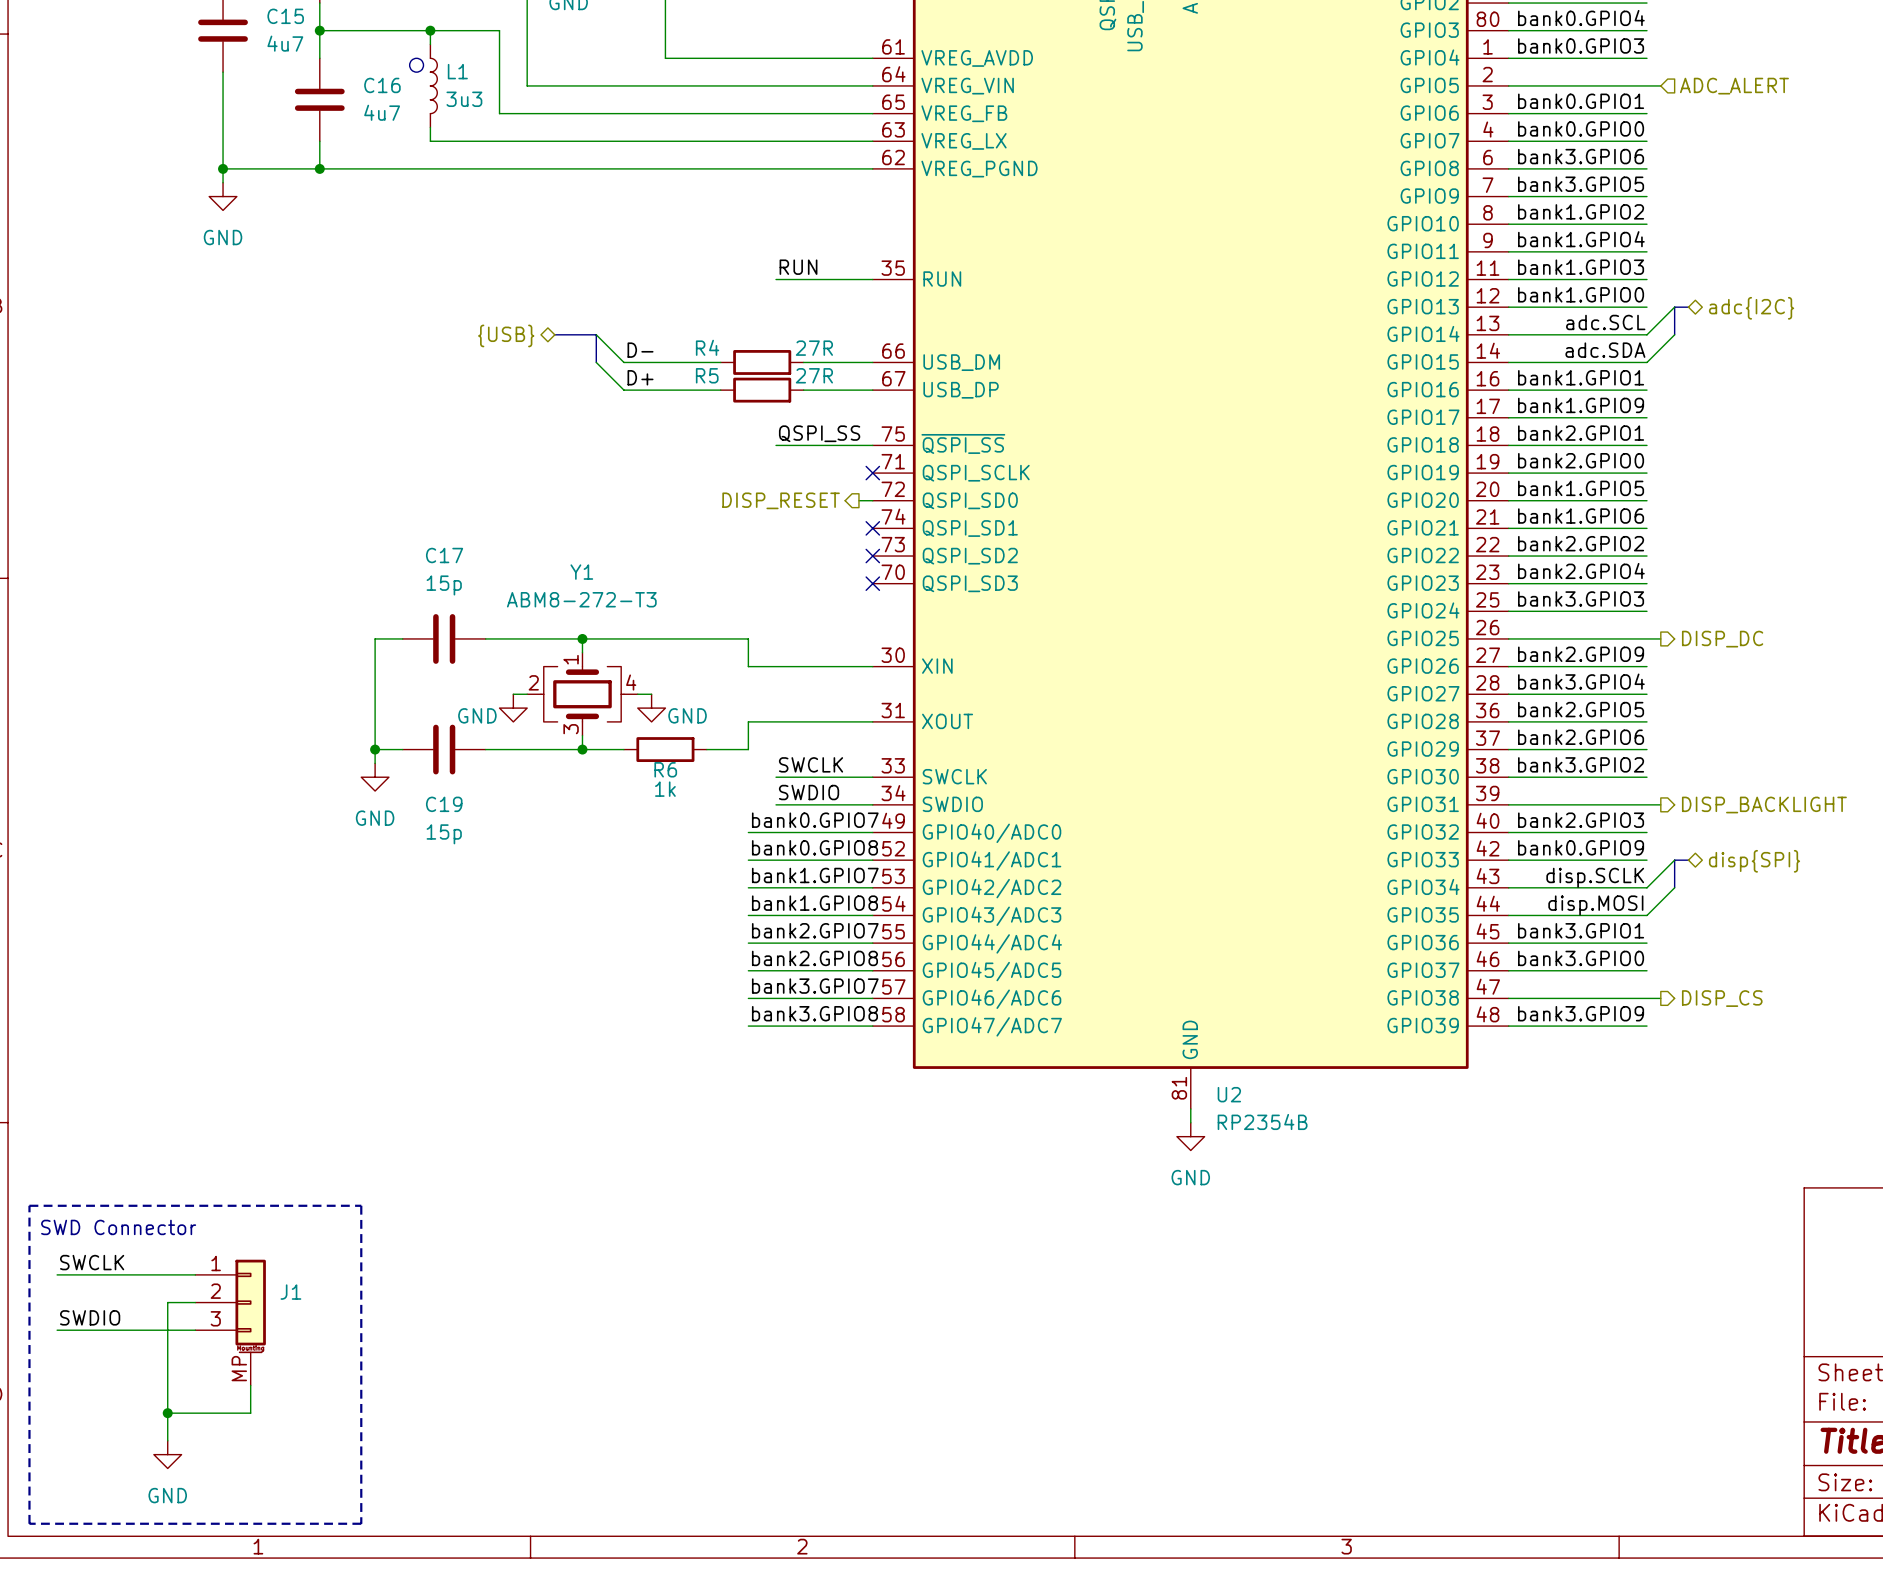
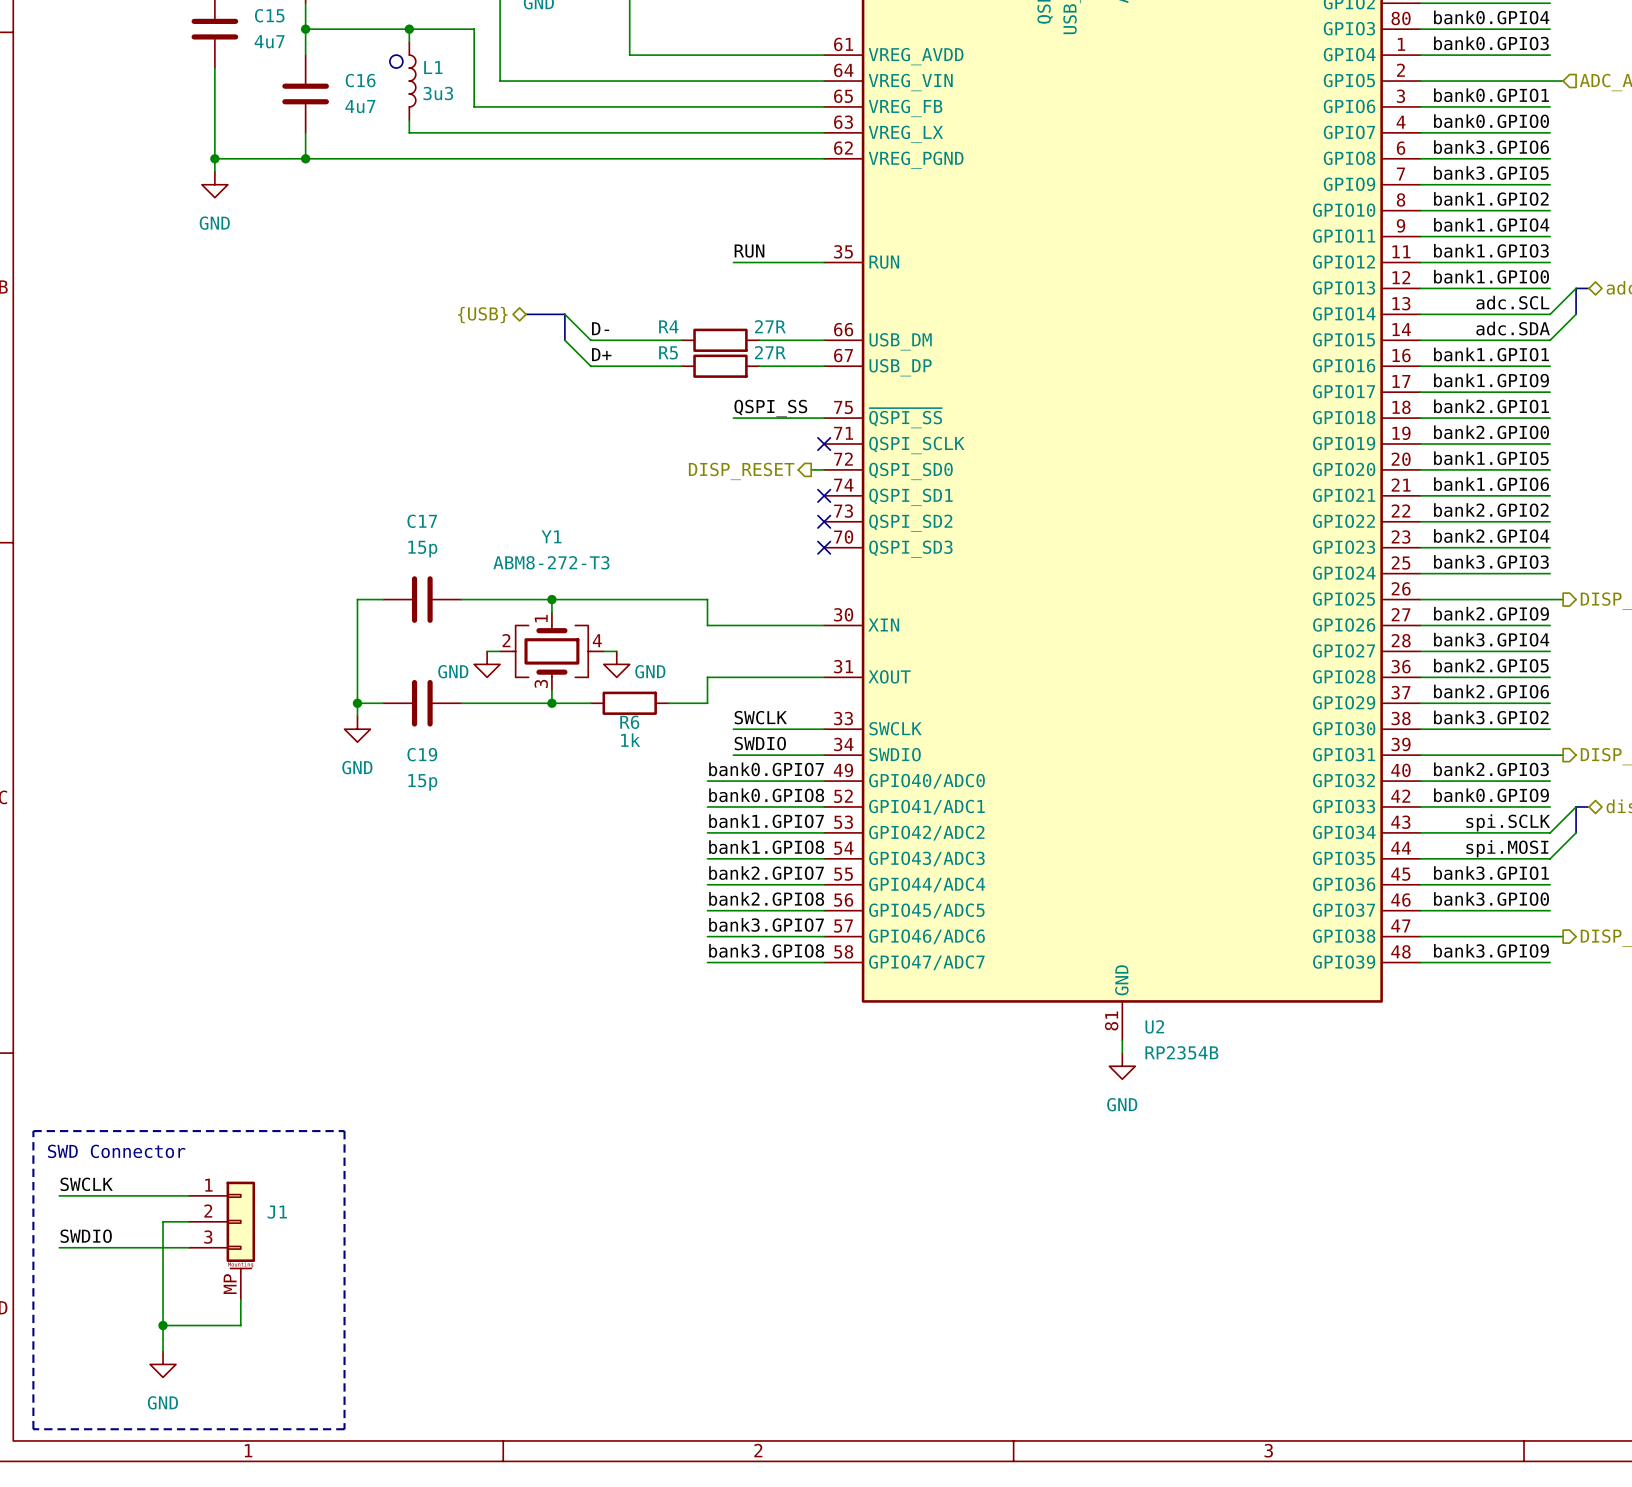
label: disp.SCLK (1595, 877) -> spi.SCLK (1508, 822)
label: disp.MOSI (1595, 905) -> spi.MOSI (1507, 848)

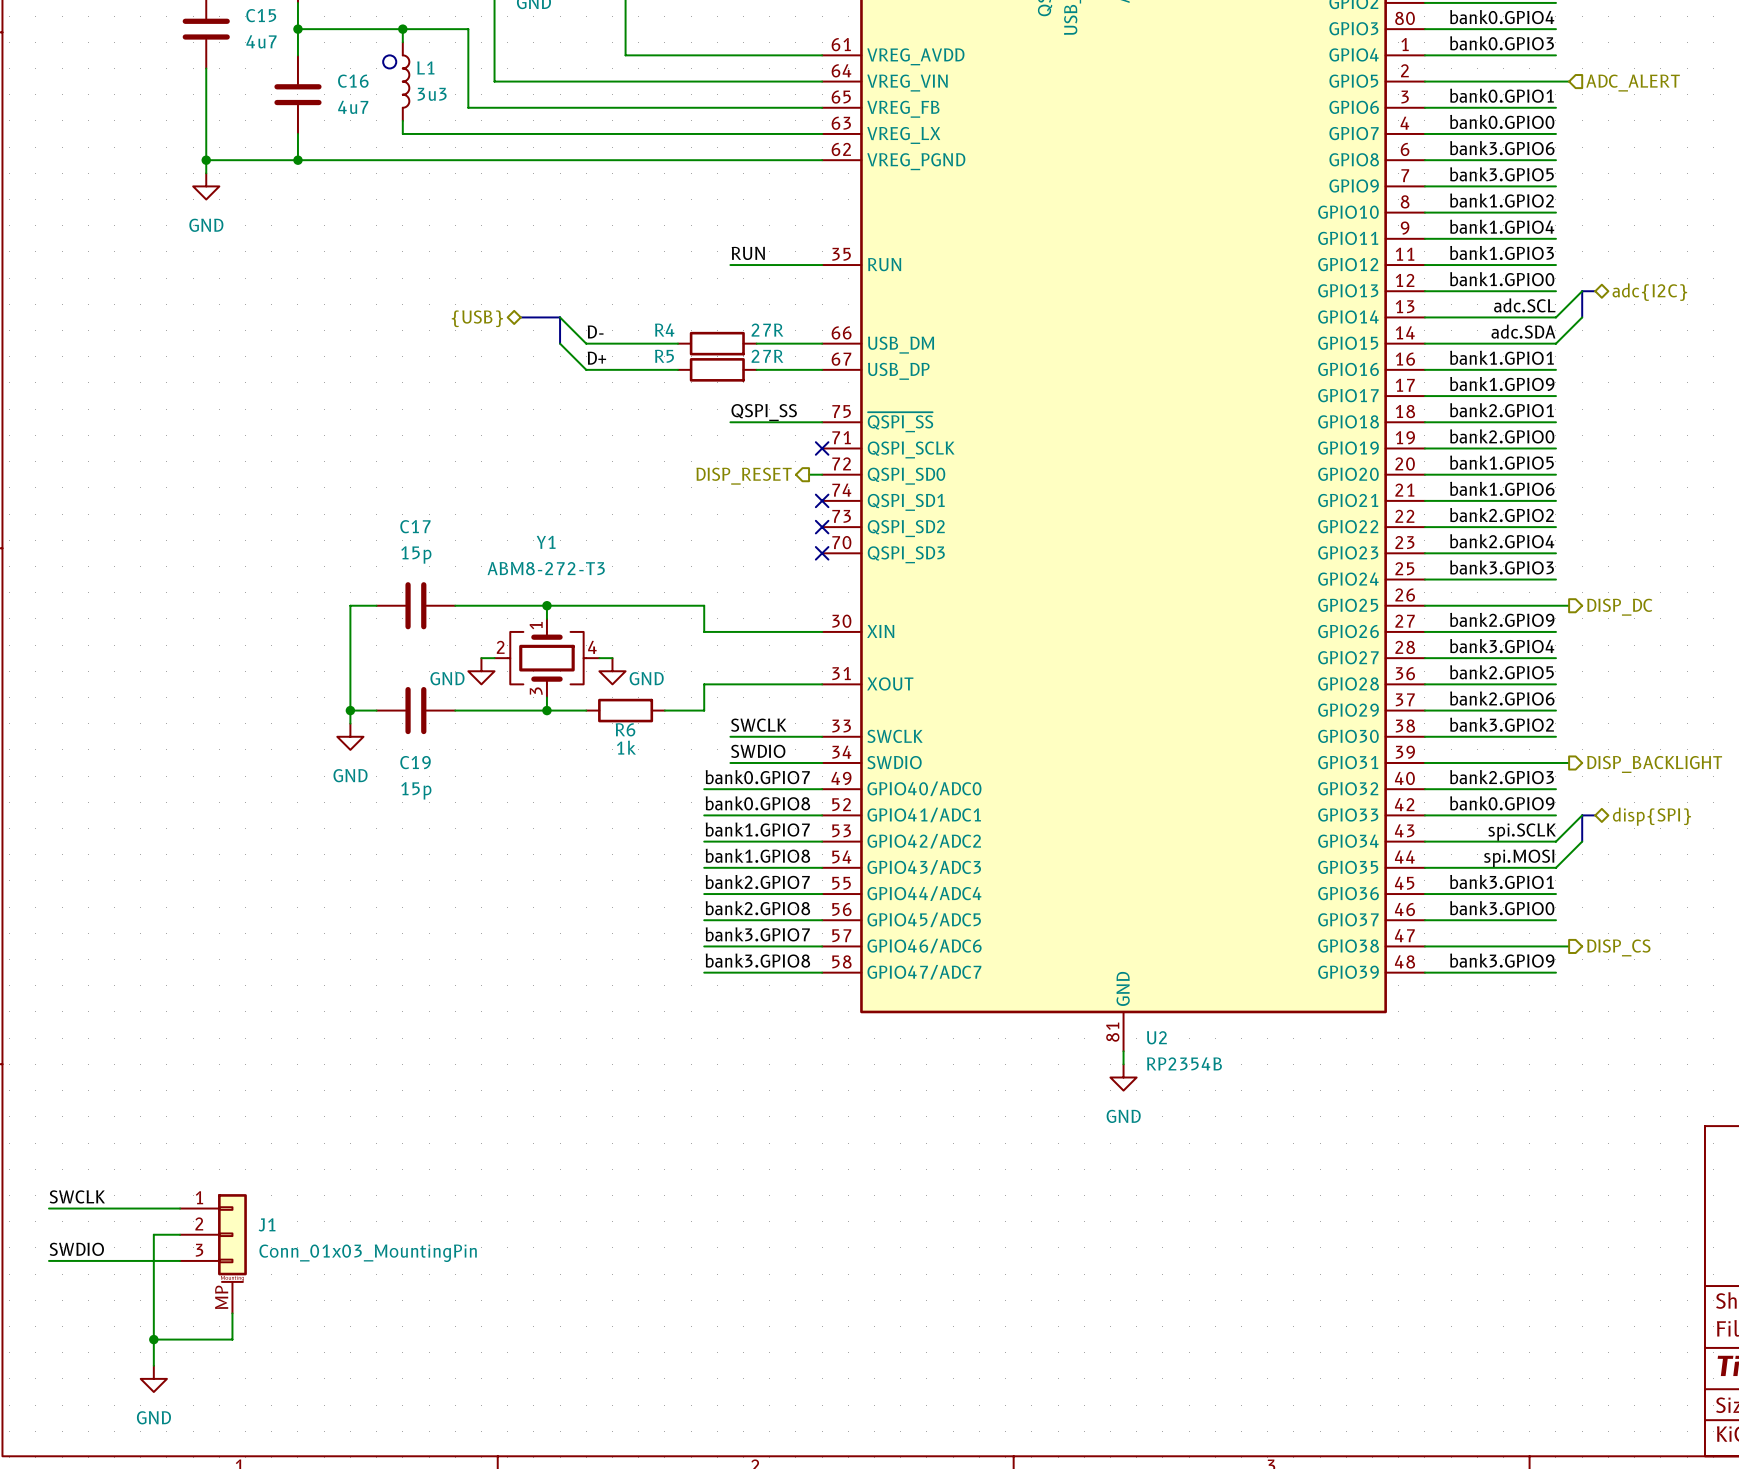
line: (33, 1131) (344, 1131) (344, 1429) (33, 1429) (33, 1131) -> none
text: SWD Connector (116, 1151) -> none
J1 value: none -> Conn_01x03_MountingPin (368, 1253)

